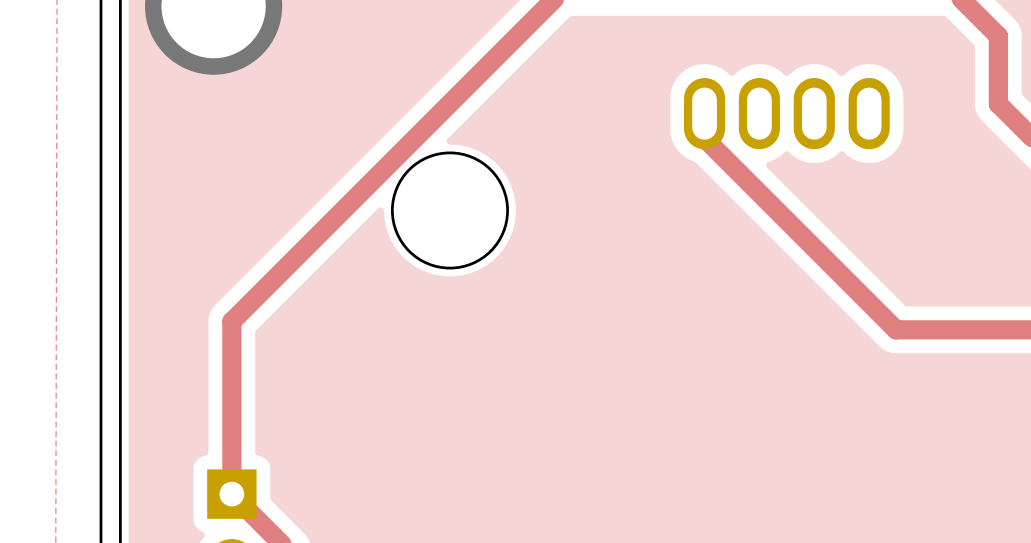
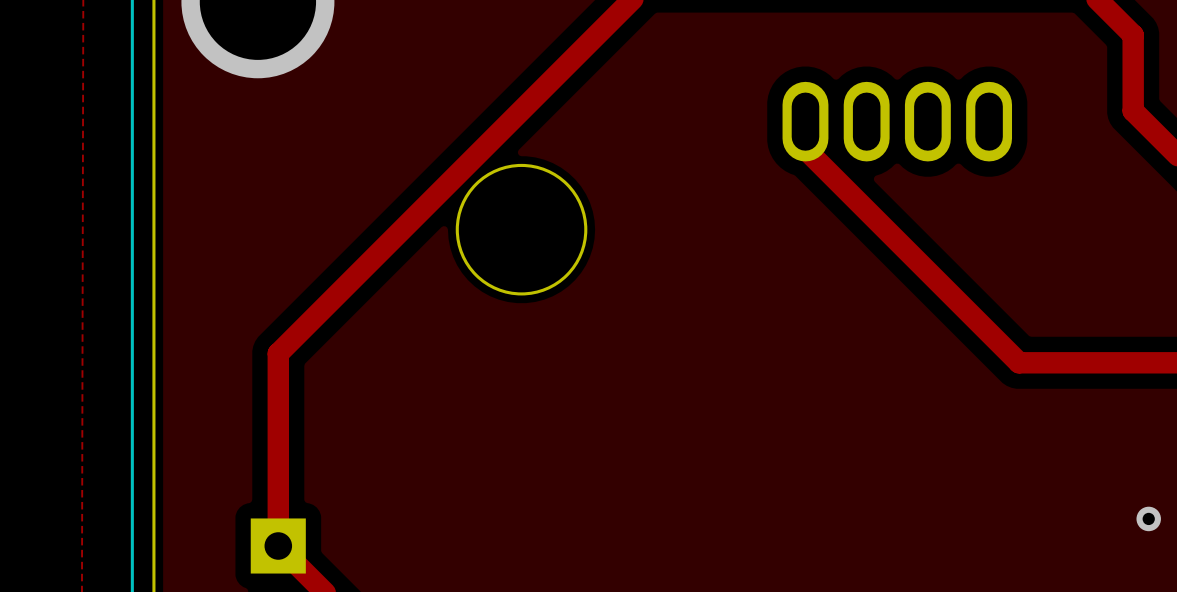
via: none -> (1148, 518)

